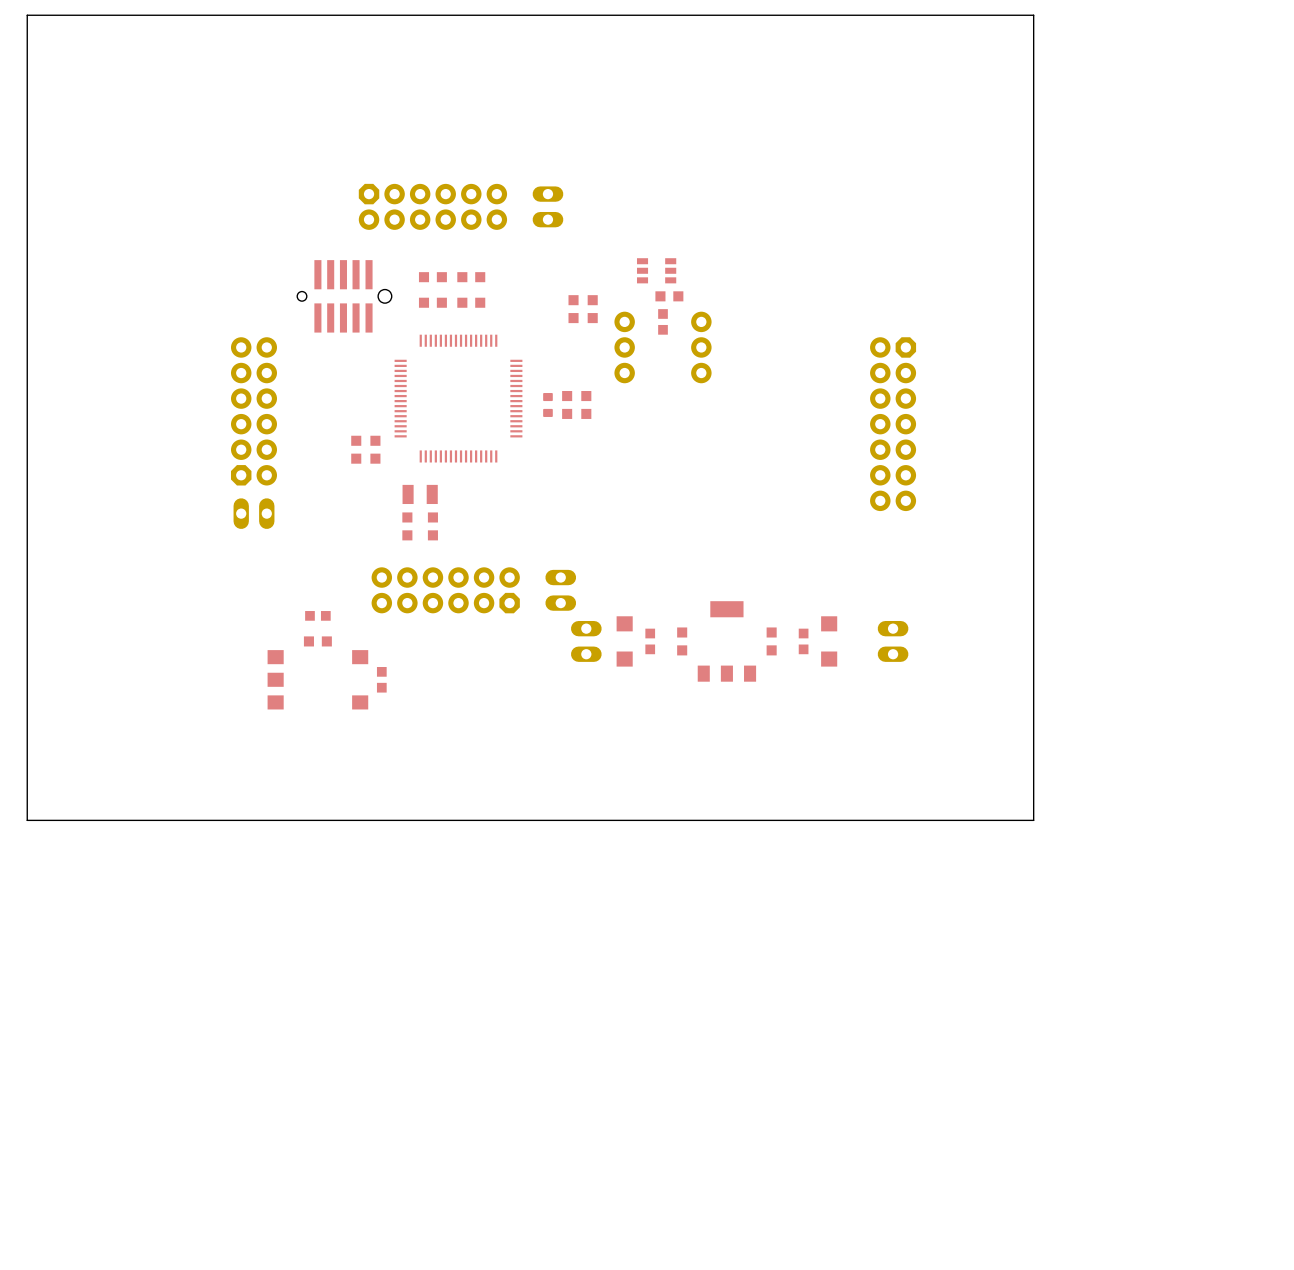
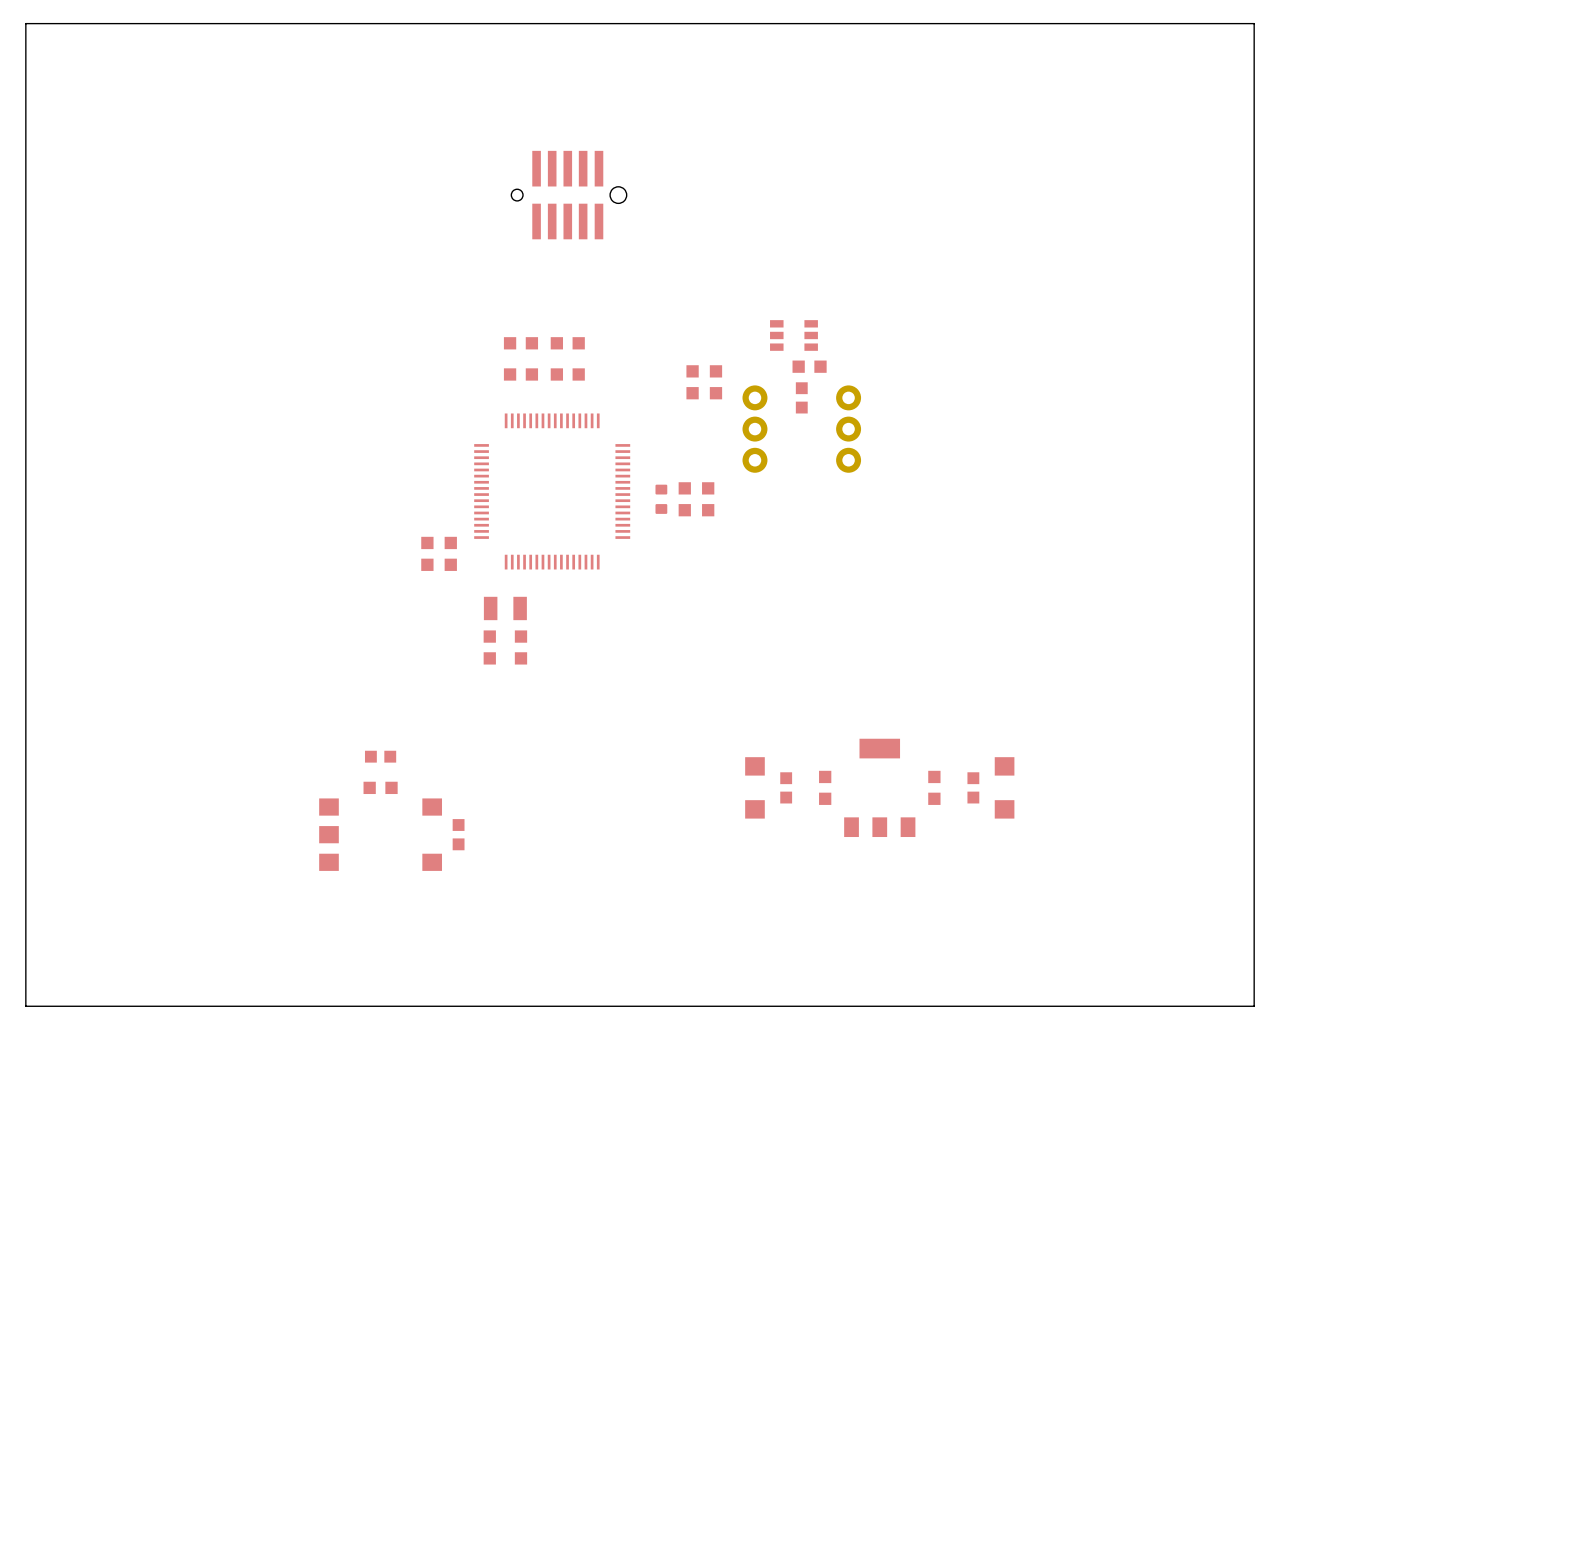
part: (432, 206) -> none
part: (547, 206) -> none
part position: (344, 296) -> (569, 195)
part: (254, 411) -> none
part: (893, 424) -> none
part: (254, 513) -> none
part: (445, 590) -> none
part: (560, 590) -> none
part: (586, 641) -> none
part: (893, 641) -> none

